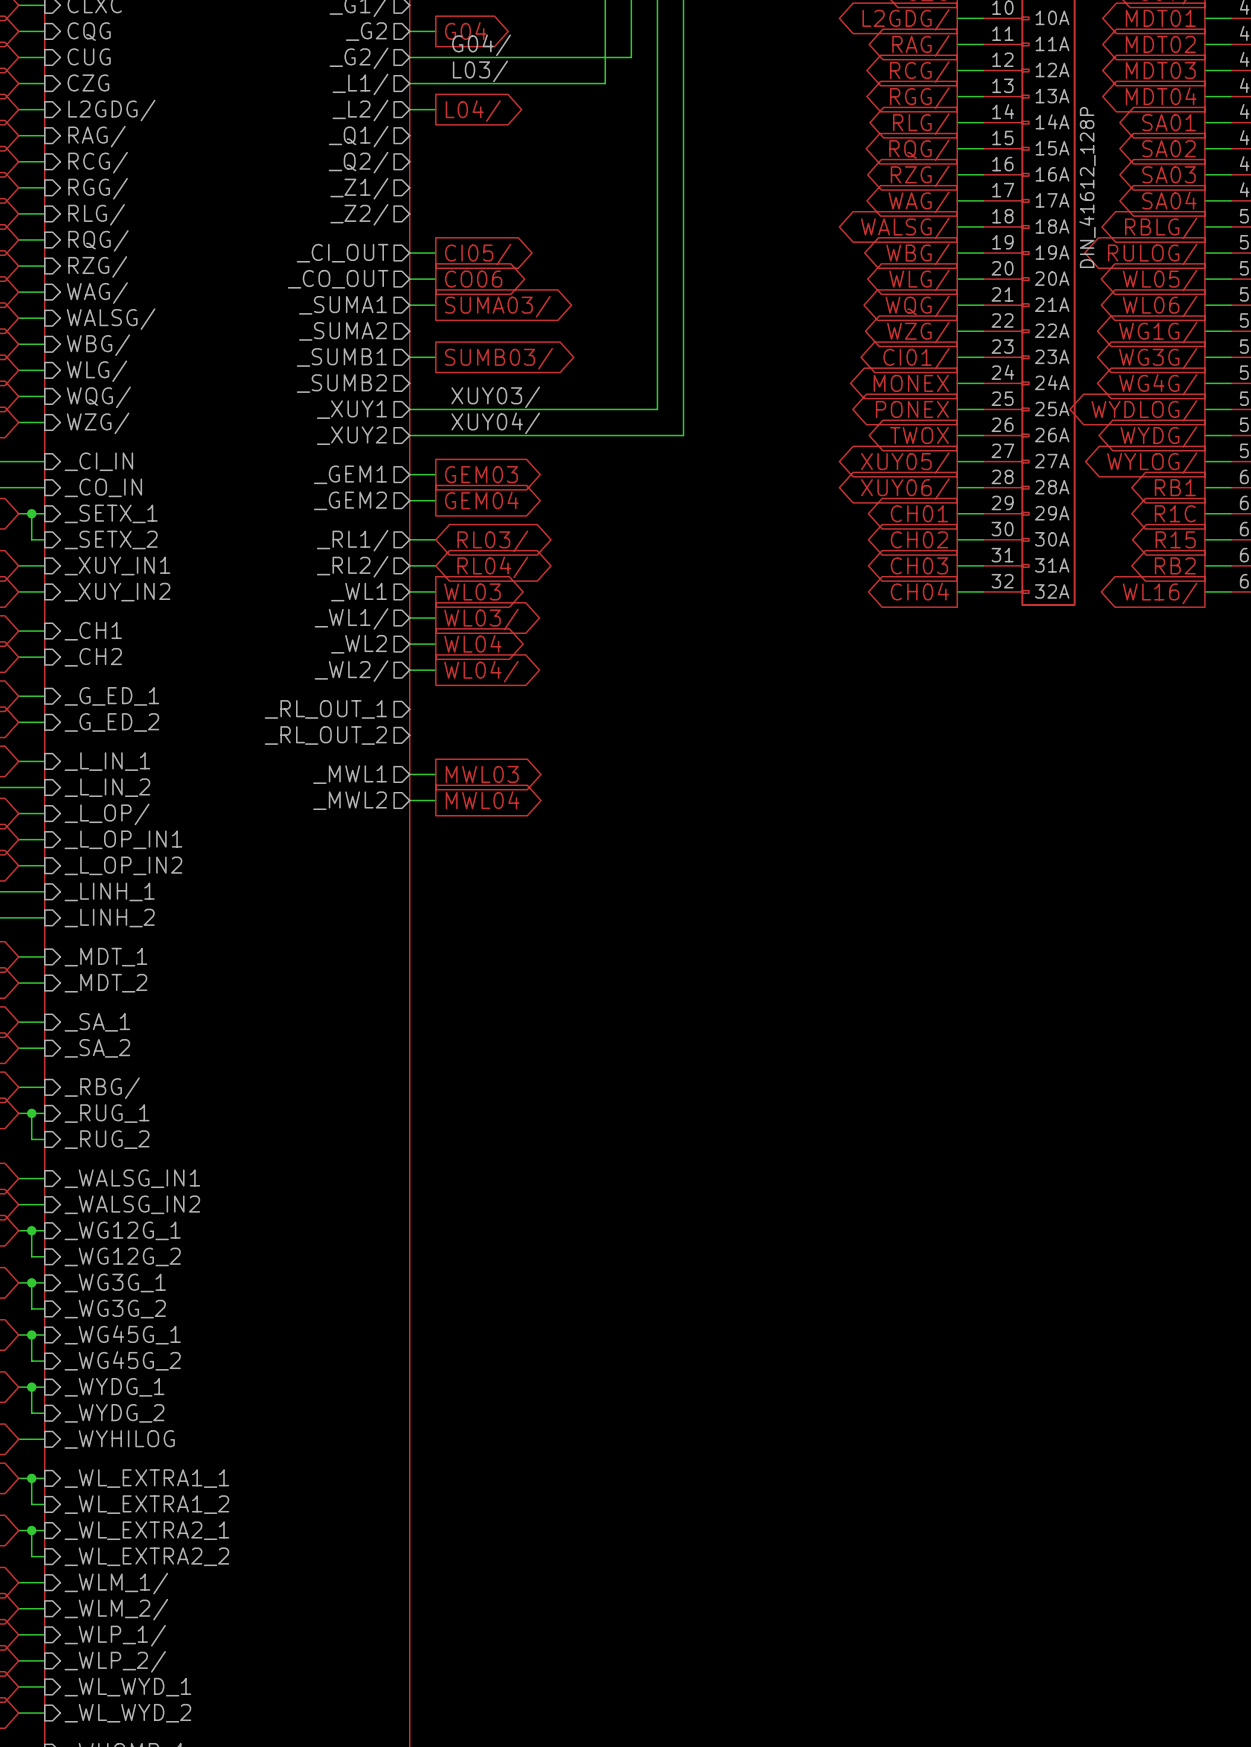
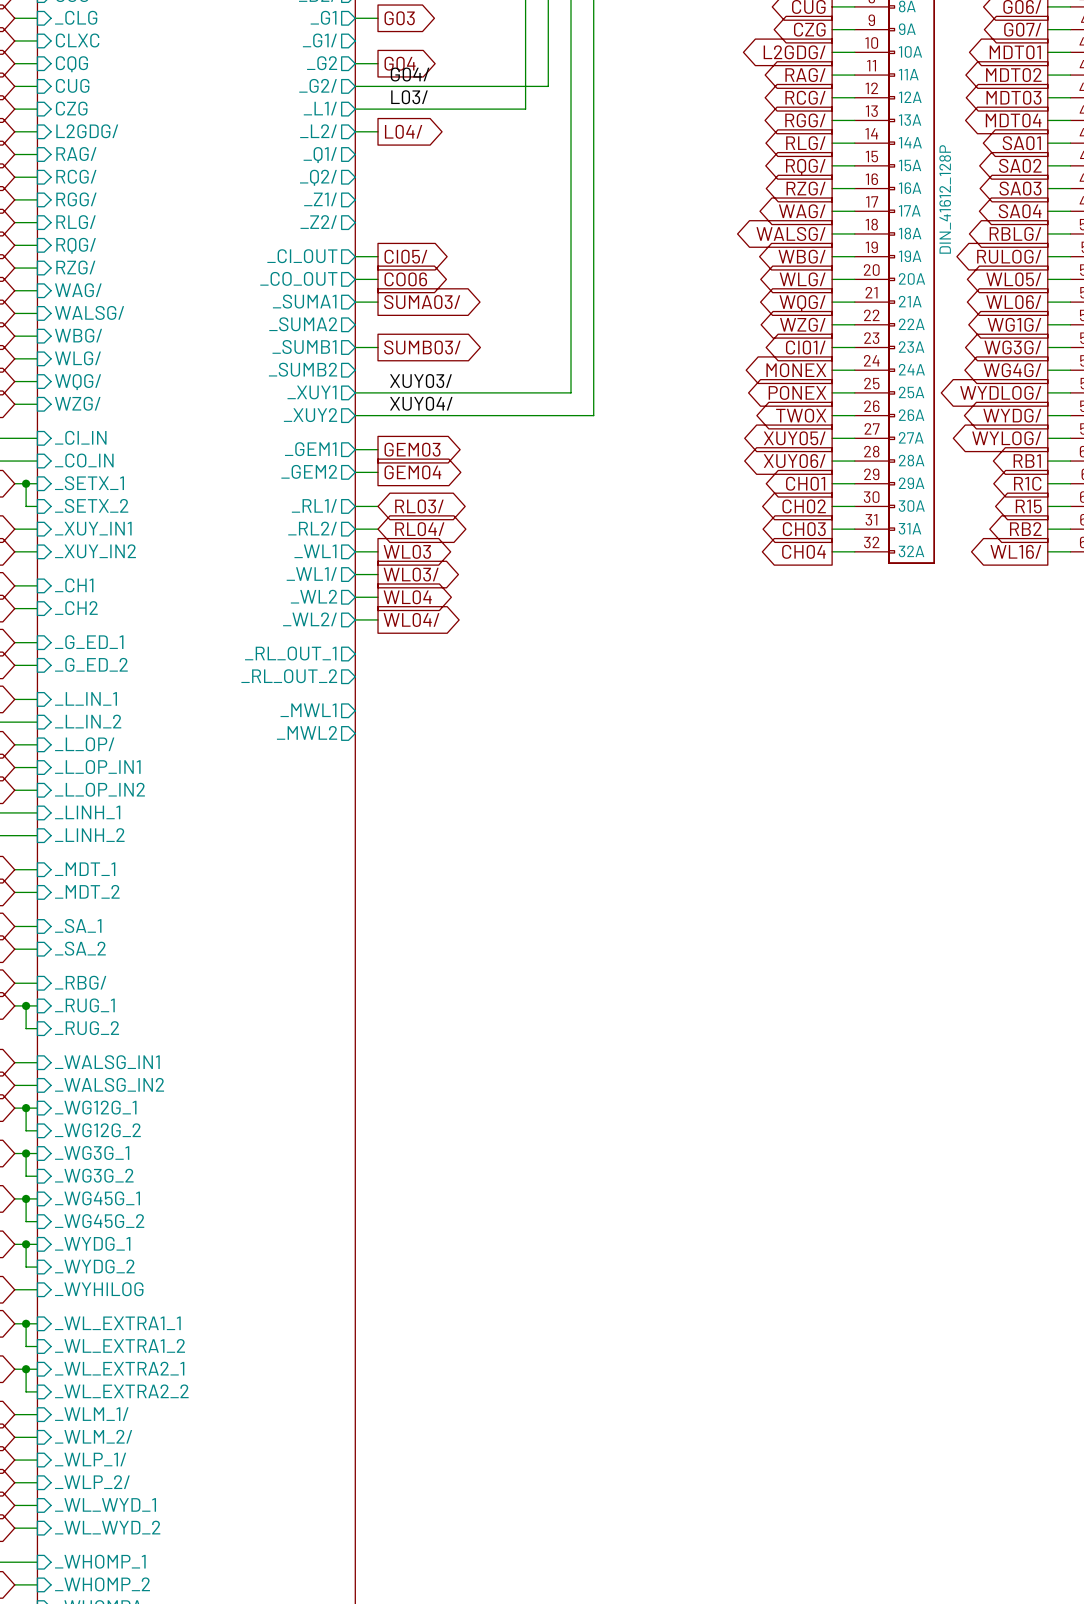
wire: (409, 774) (435, 774) -> none
global label: MWL03 (482, 774) -> none
wire: (409, 800) (435, 800) -> none
global label: MWL04 (482, 800) -> none

